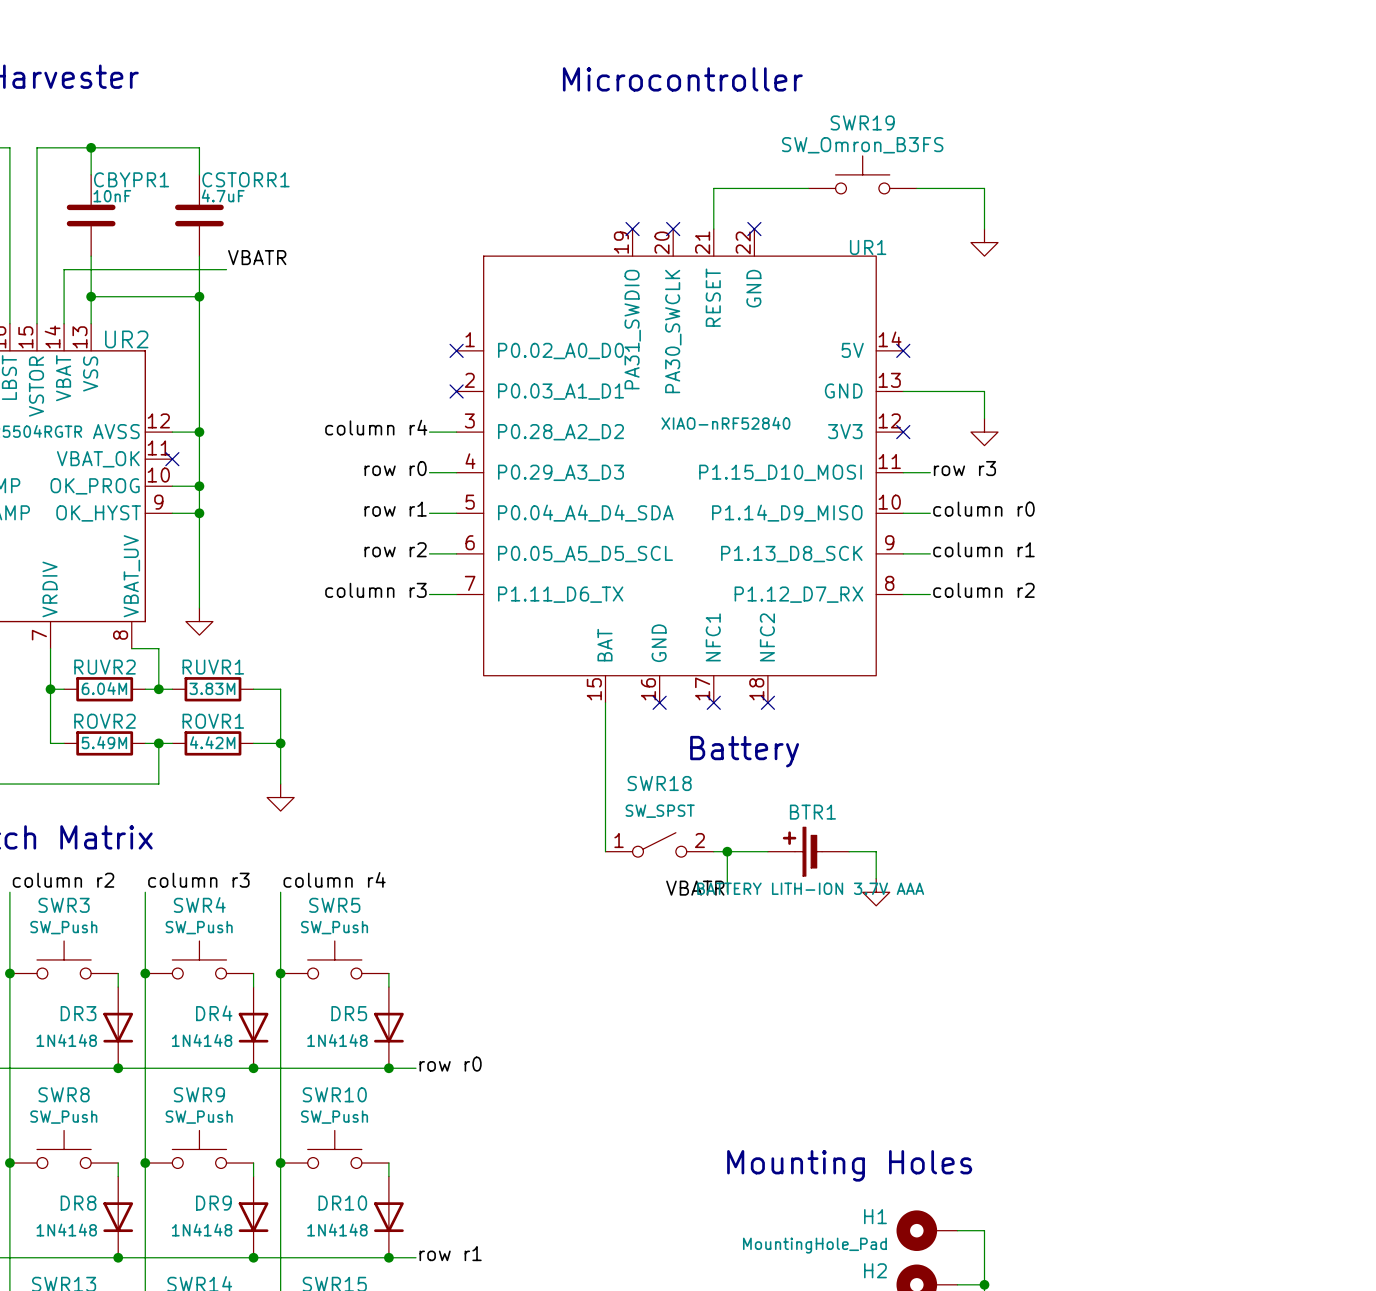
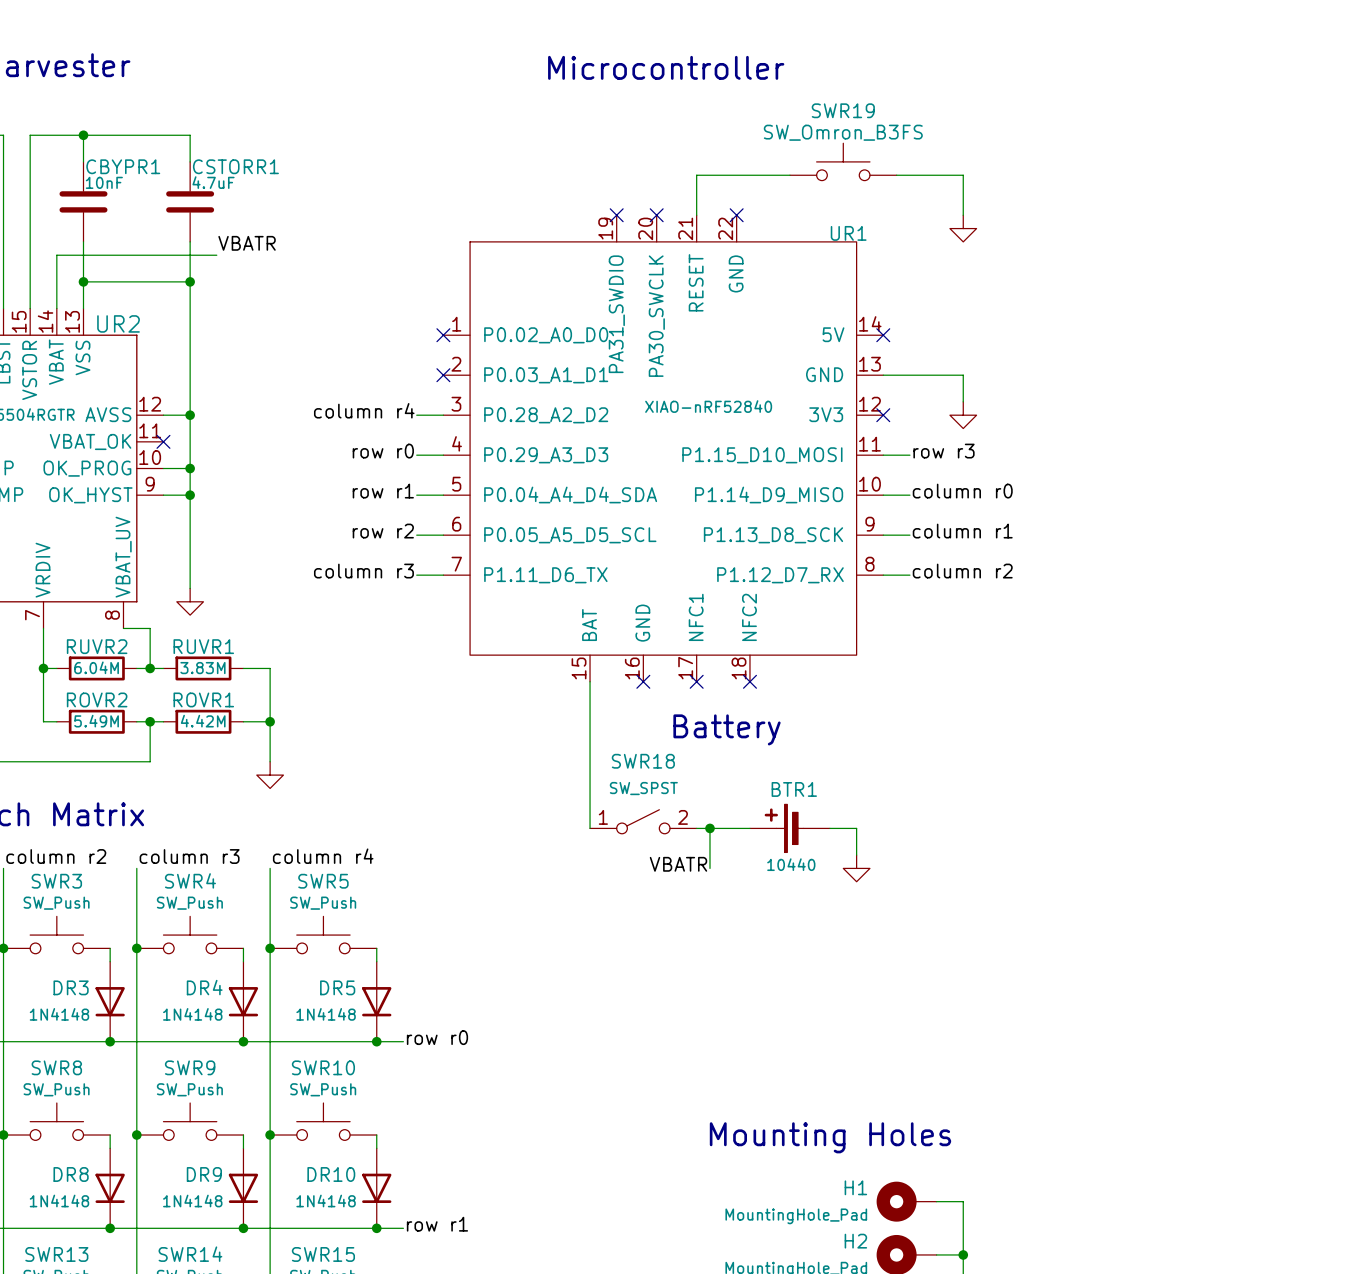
BTR1 value: BATTERY LITH-ION 3.7V AAA (810, 888) -> 10440 (791, 864)

